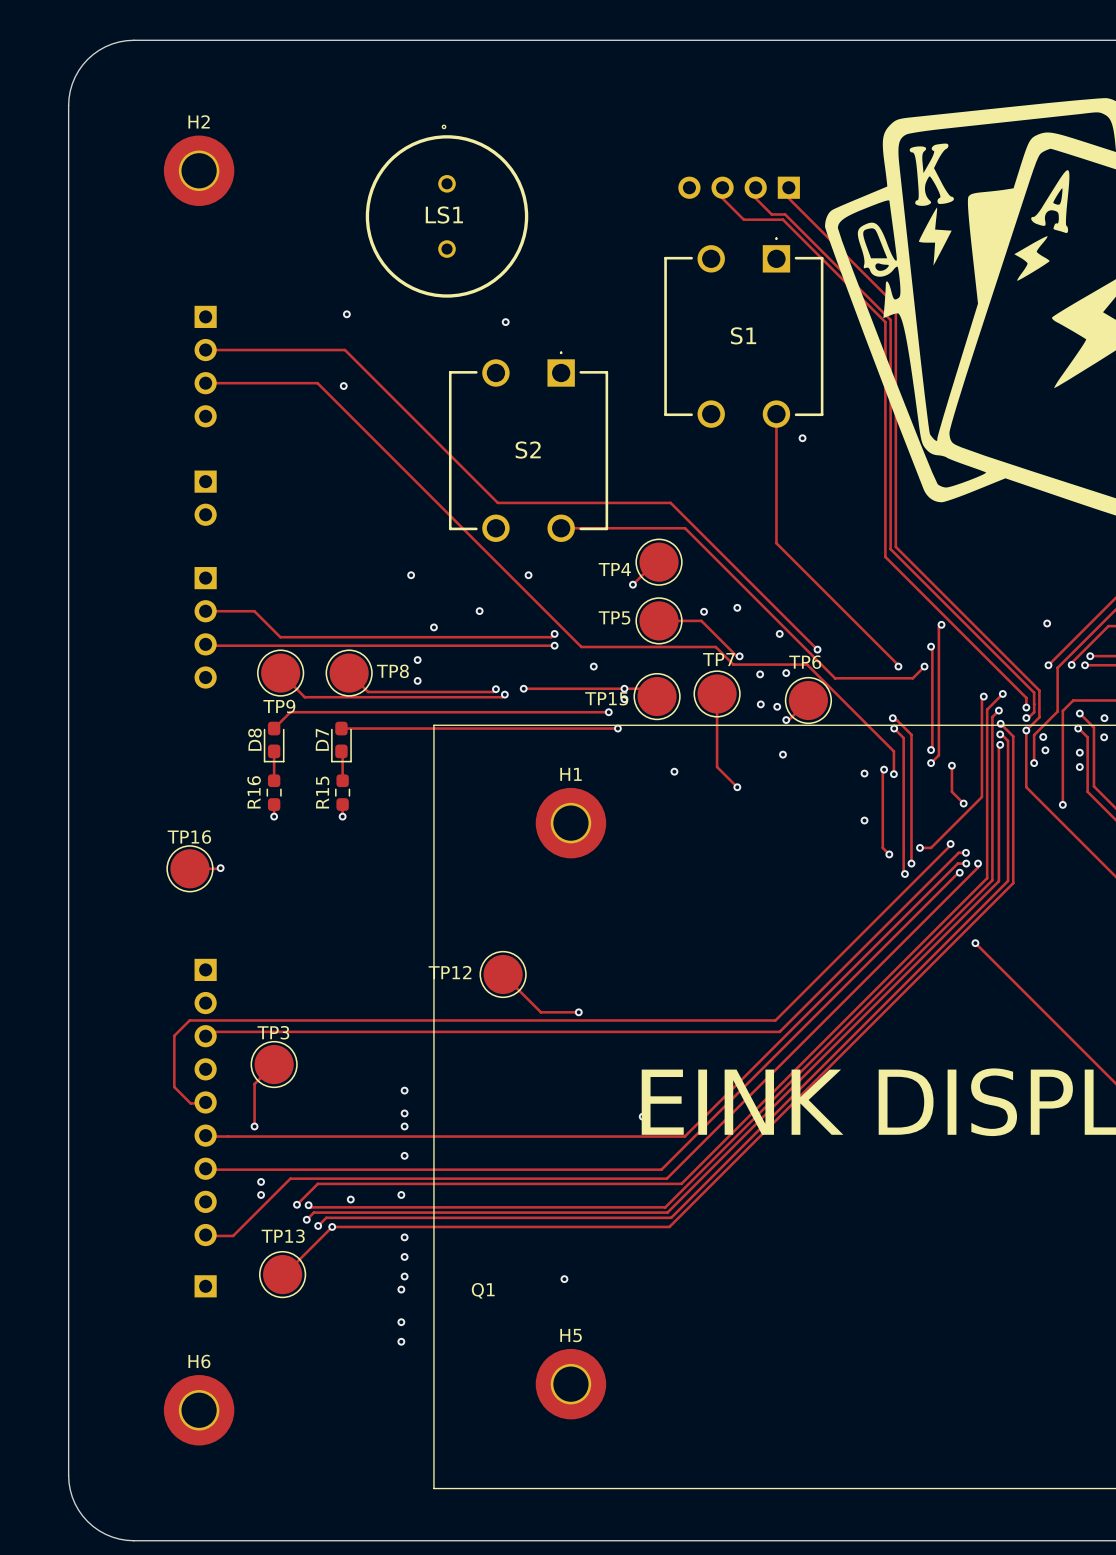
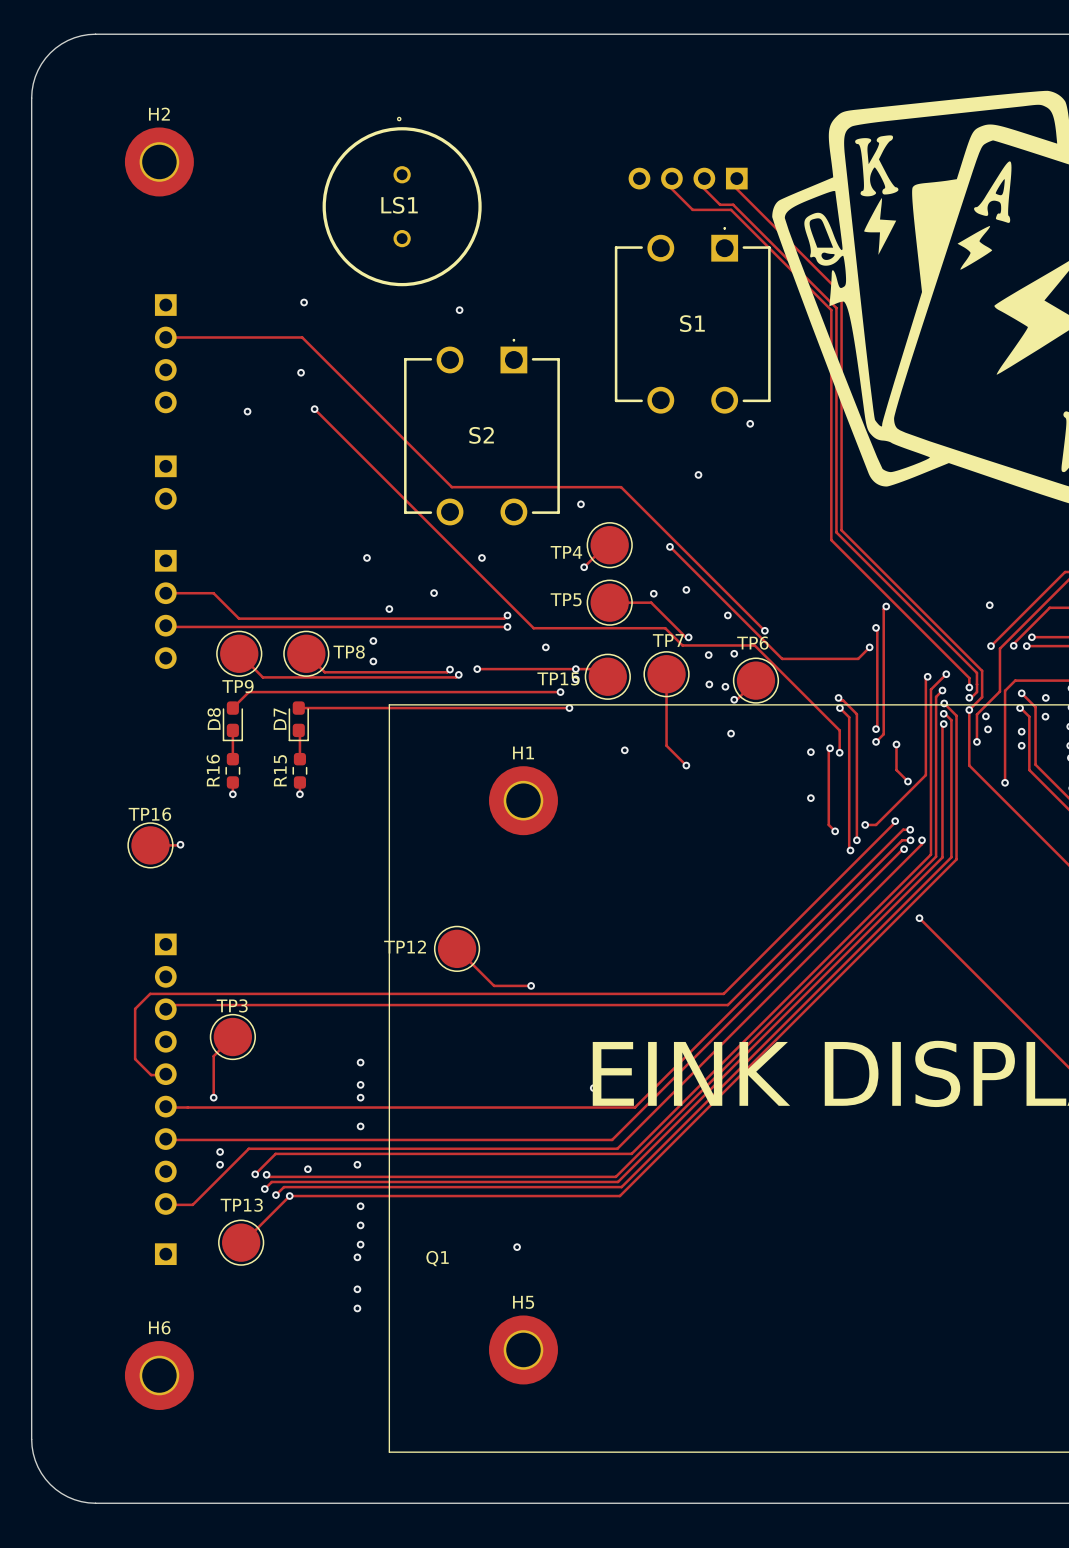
track: (205, 383) (317, 383) (357, 423) -> none
track: (776, 414) (776, 543) (898, 666) -> none
via: none -> (314, 409)
via: none -> (247, 411)
via: none -> (698, 474)
via: none -> (580, 504)
track: (561, 528) (685, 528) (720, 563) -> none
via: none -> (669, 546)
via: (898, 666) -> none

